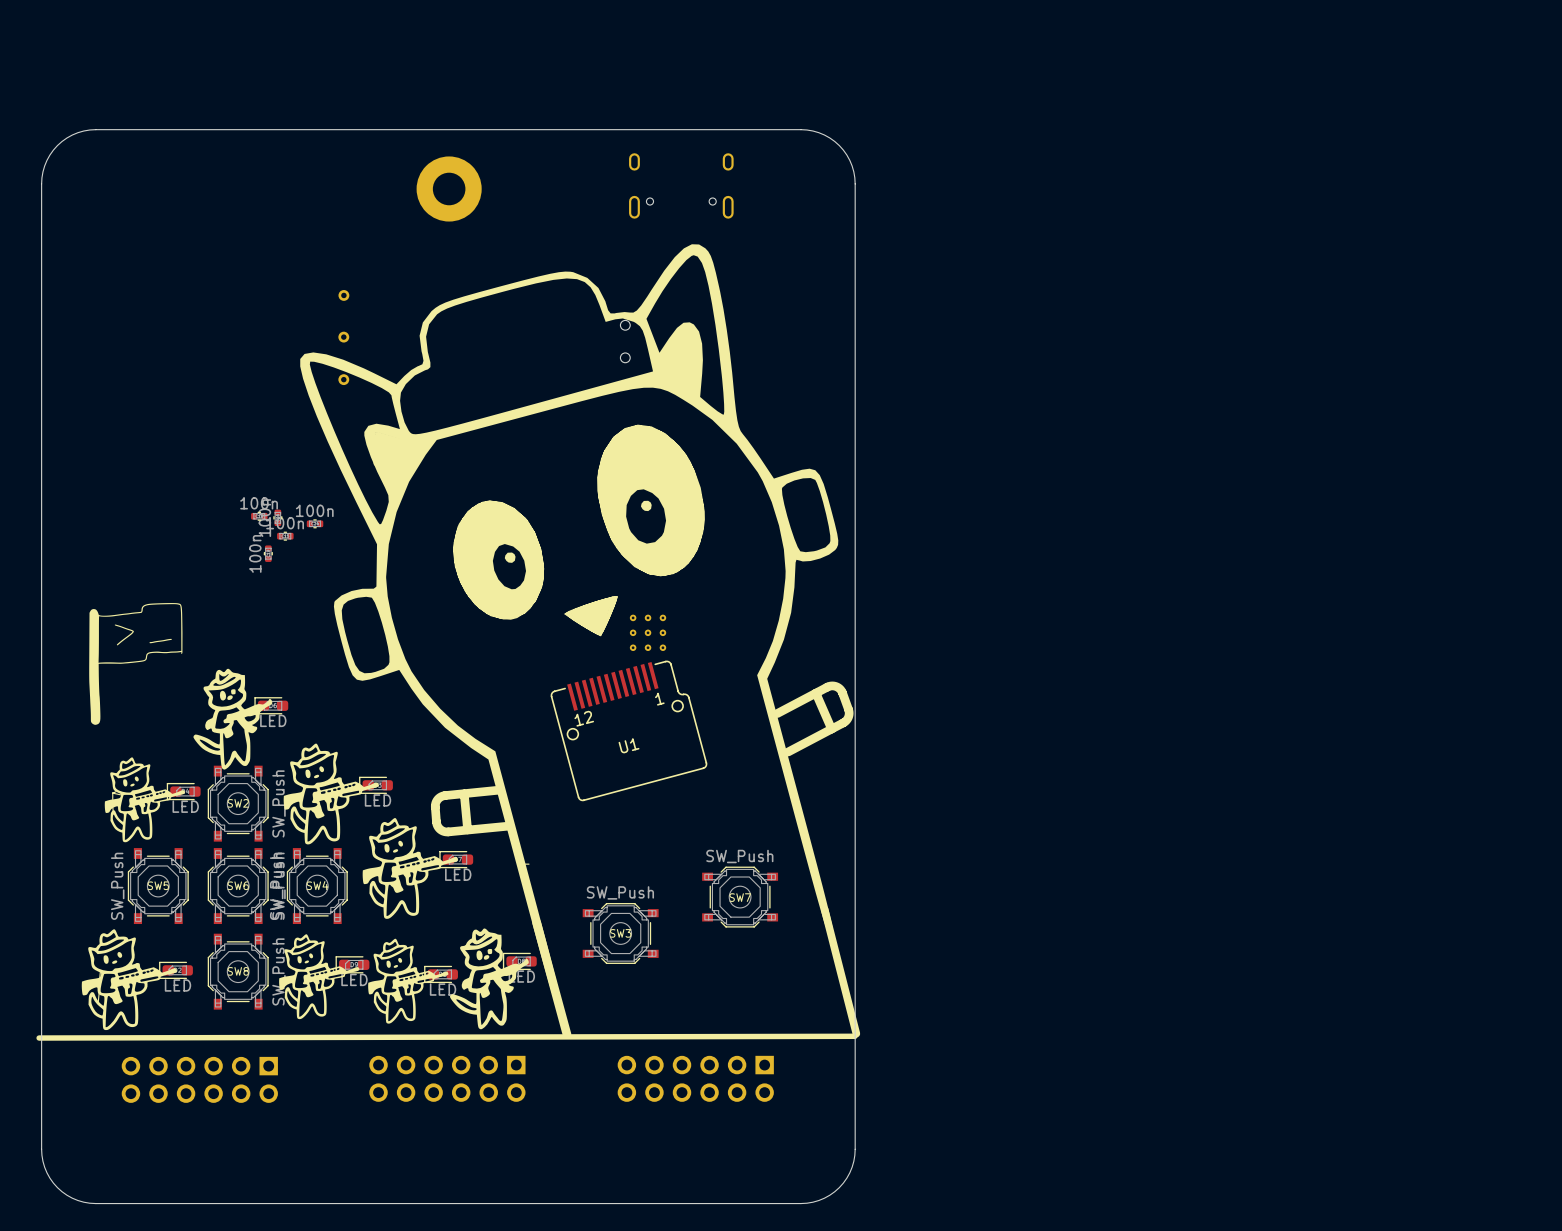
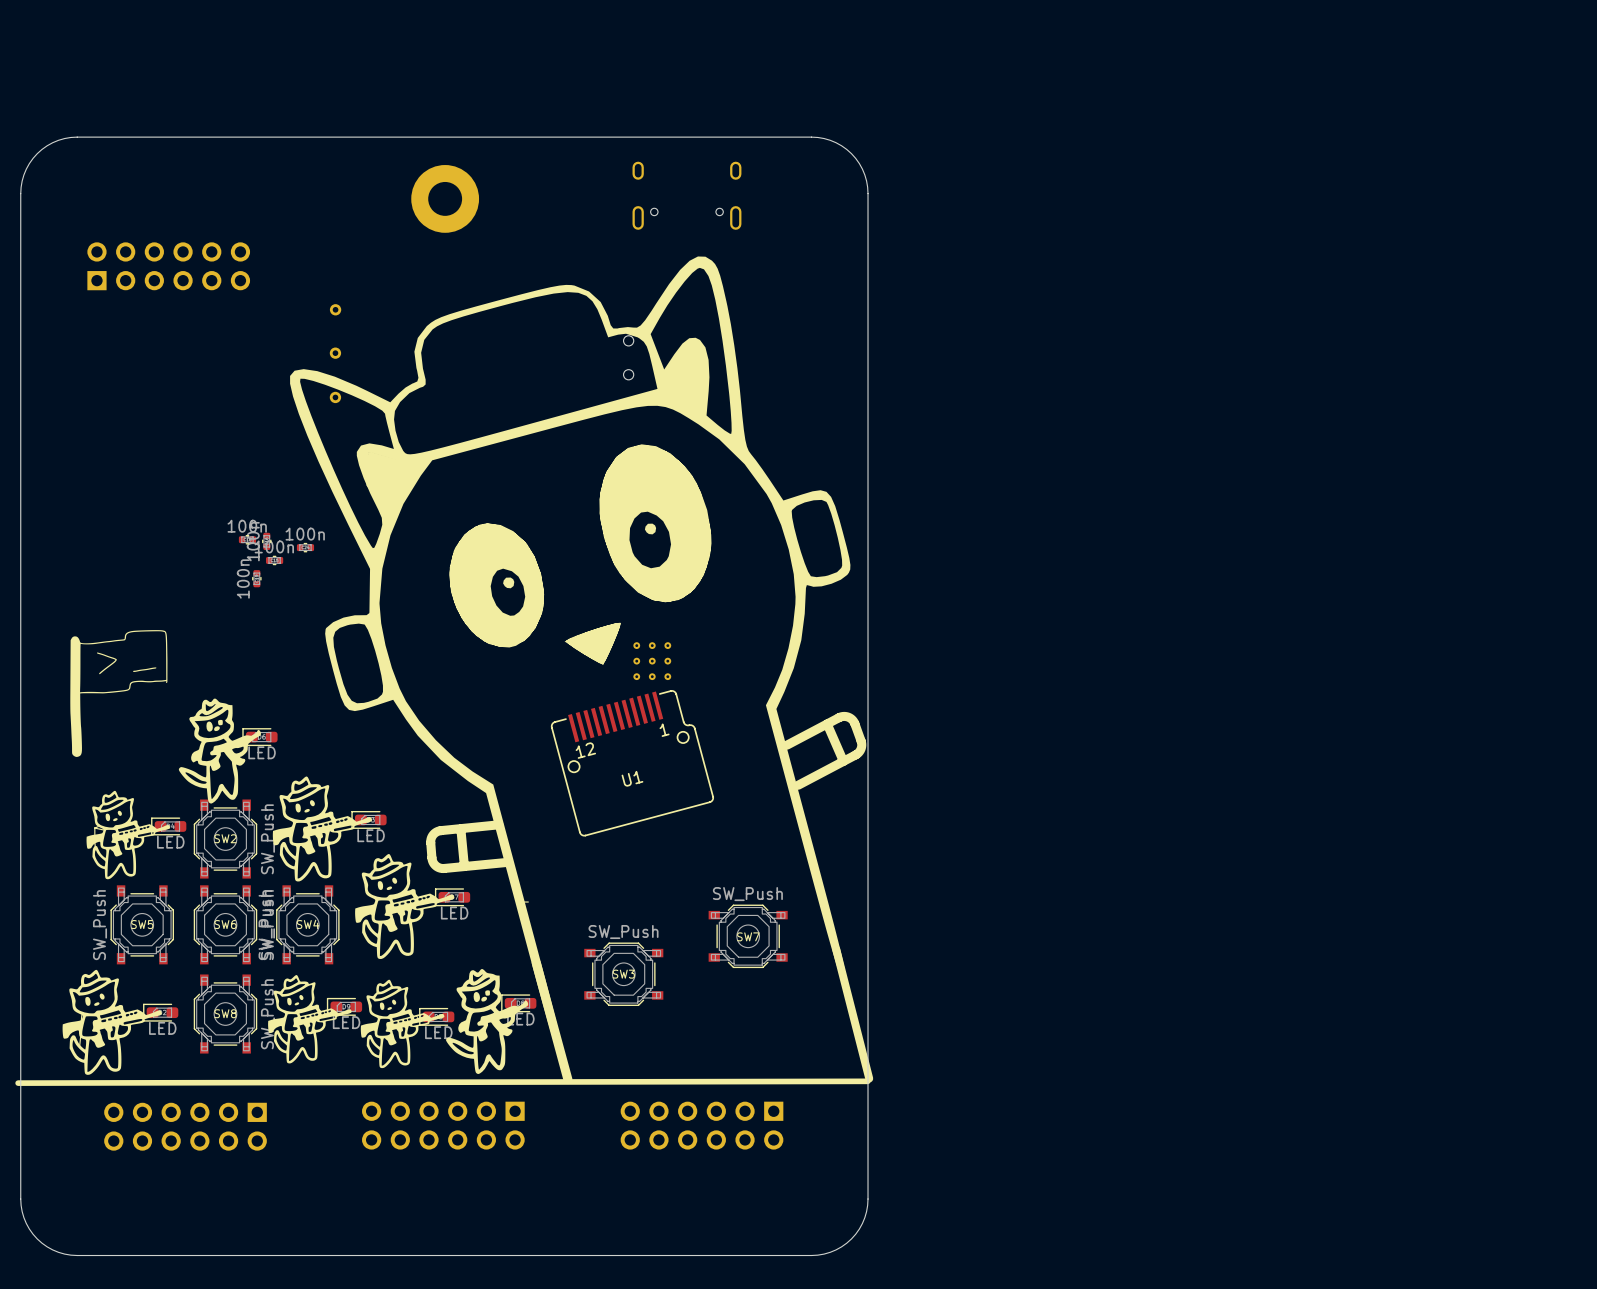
part: none -> (168, 266)

